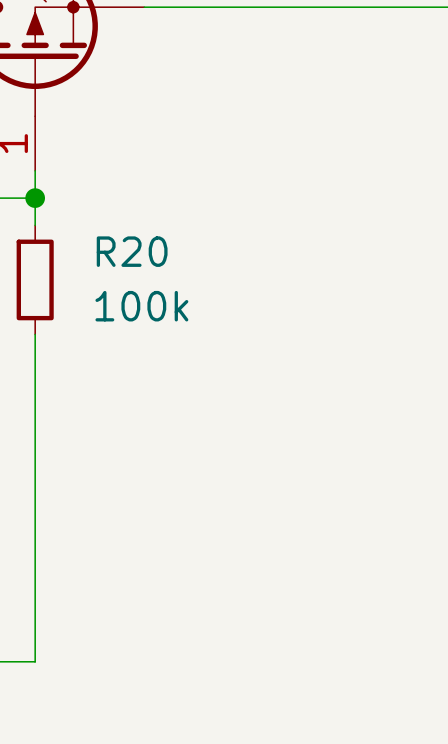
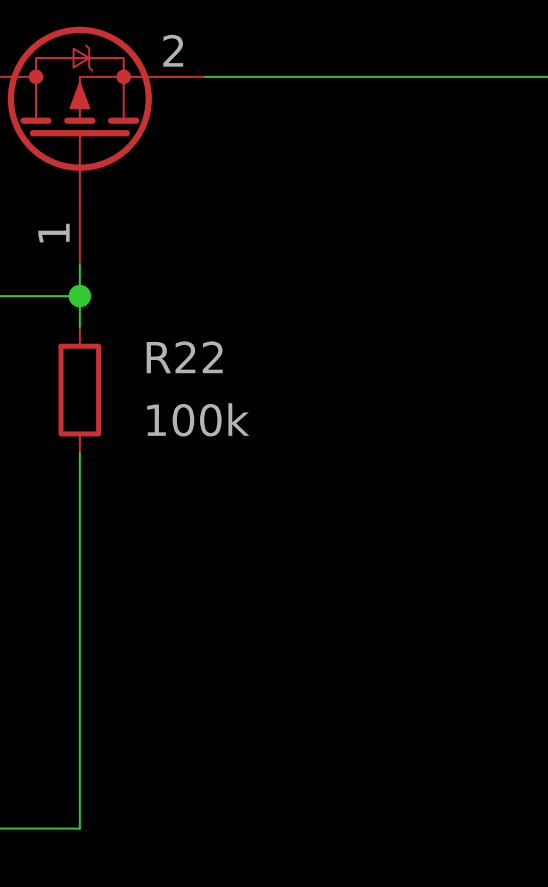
R20 name: R20 (132, 251) -> R22 (184, 357)

